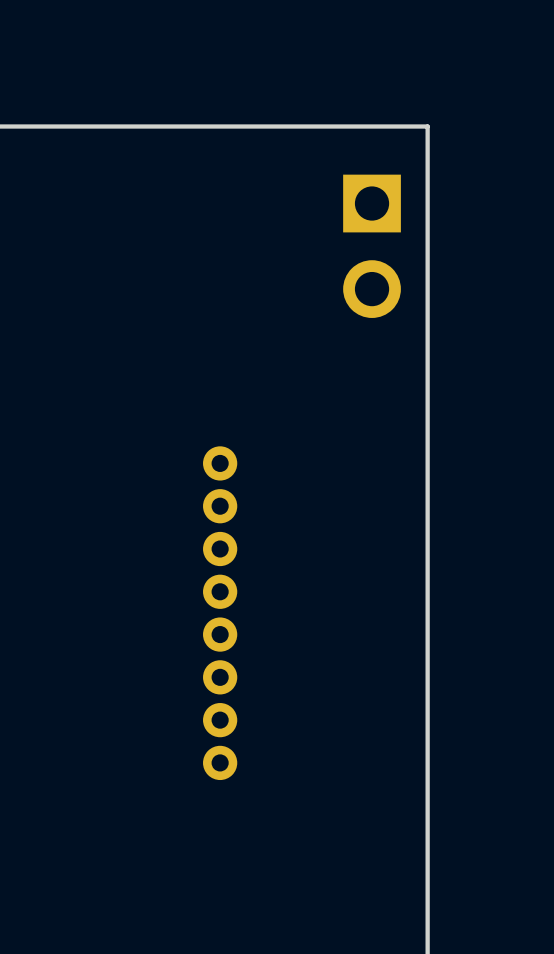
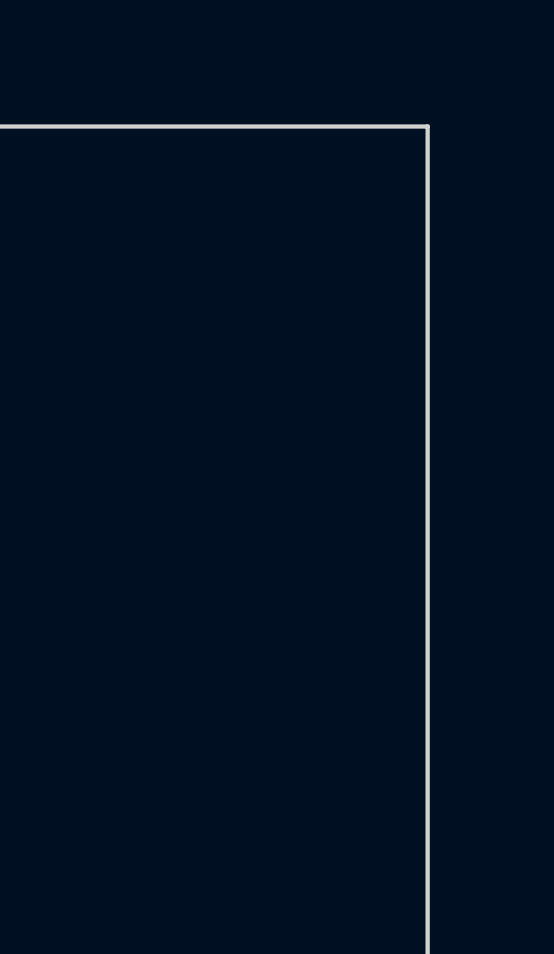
part: (372, 246) -> none
part: (220, 613) -> none

